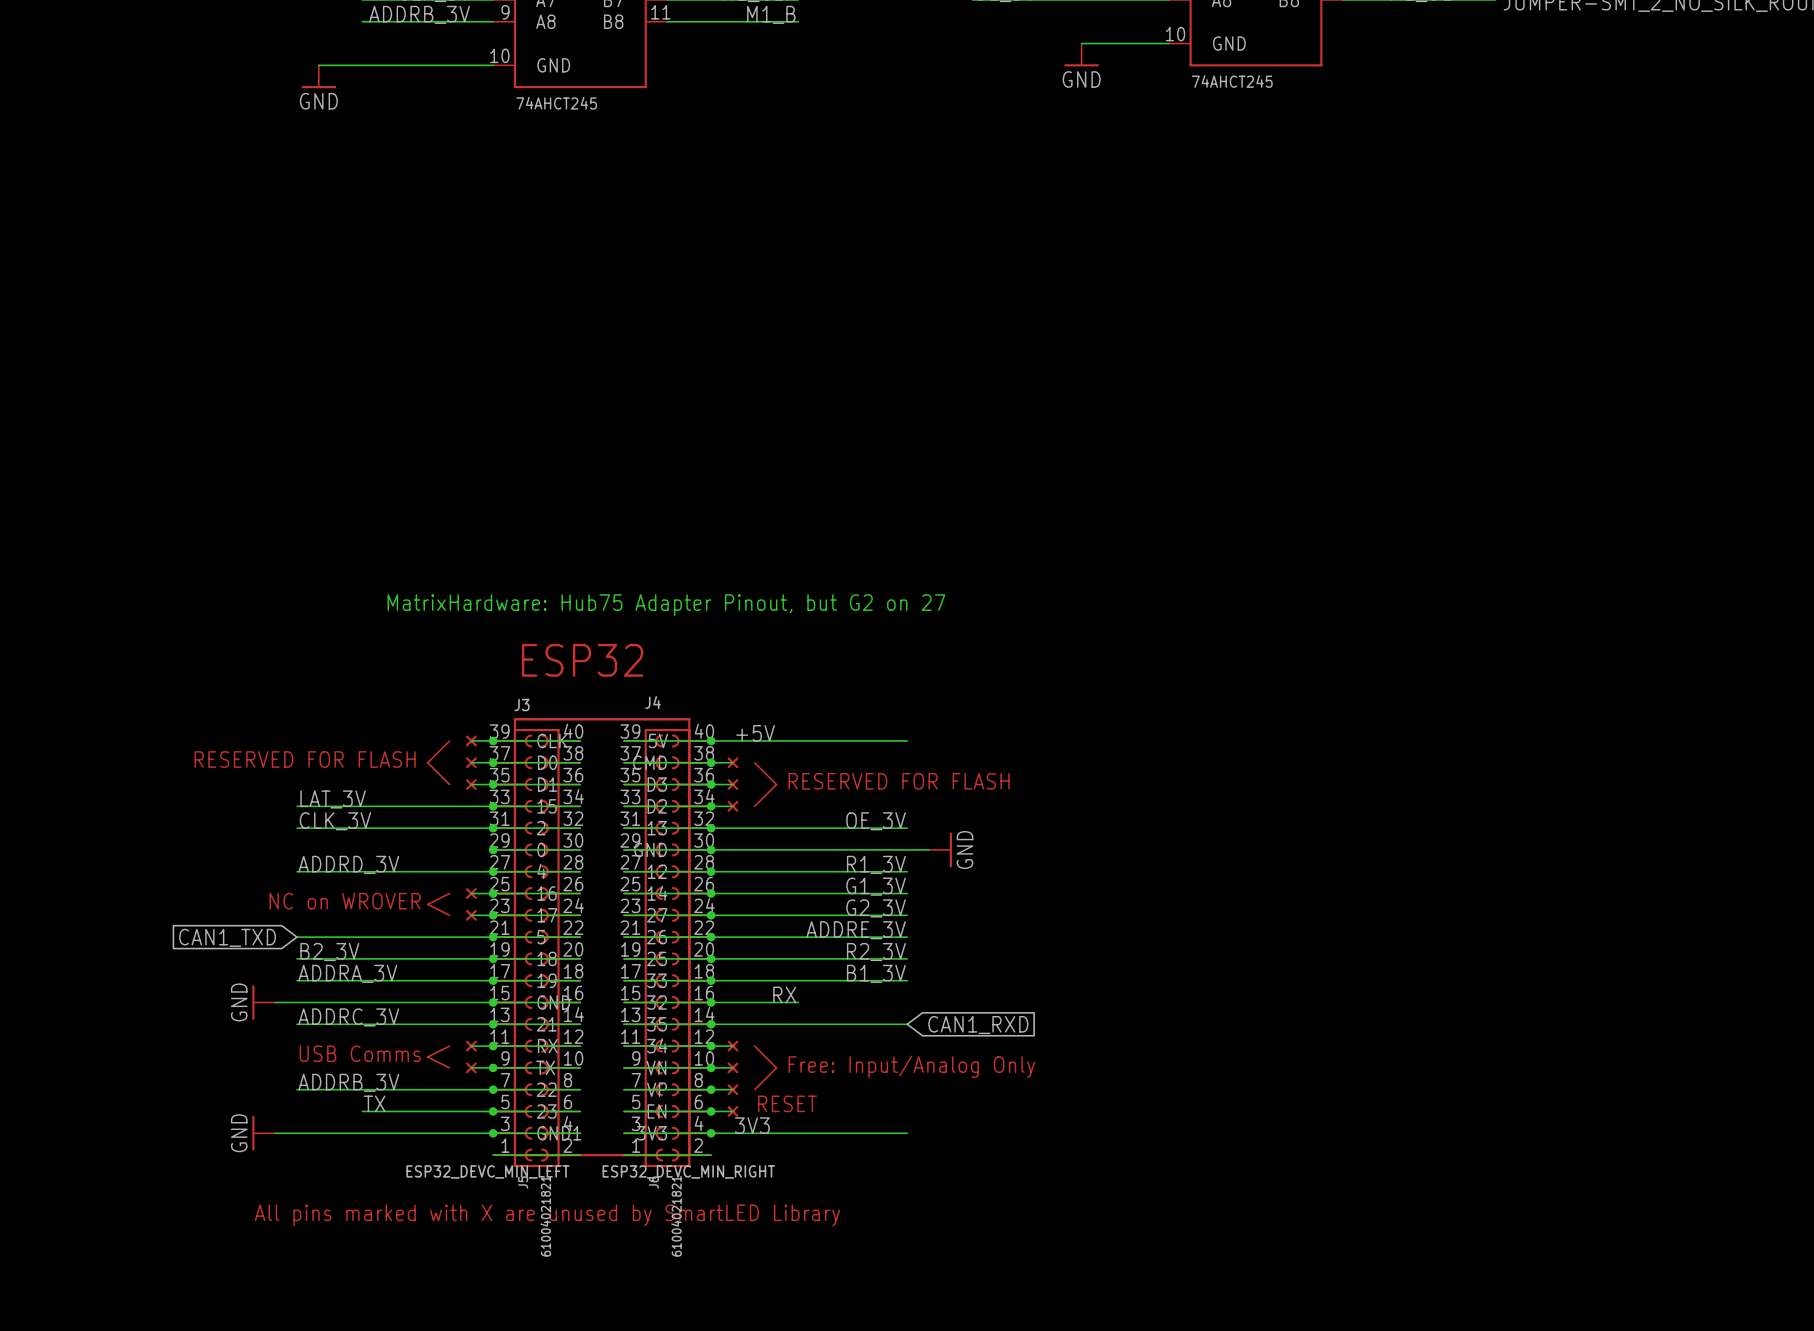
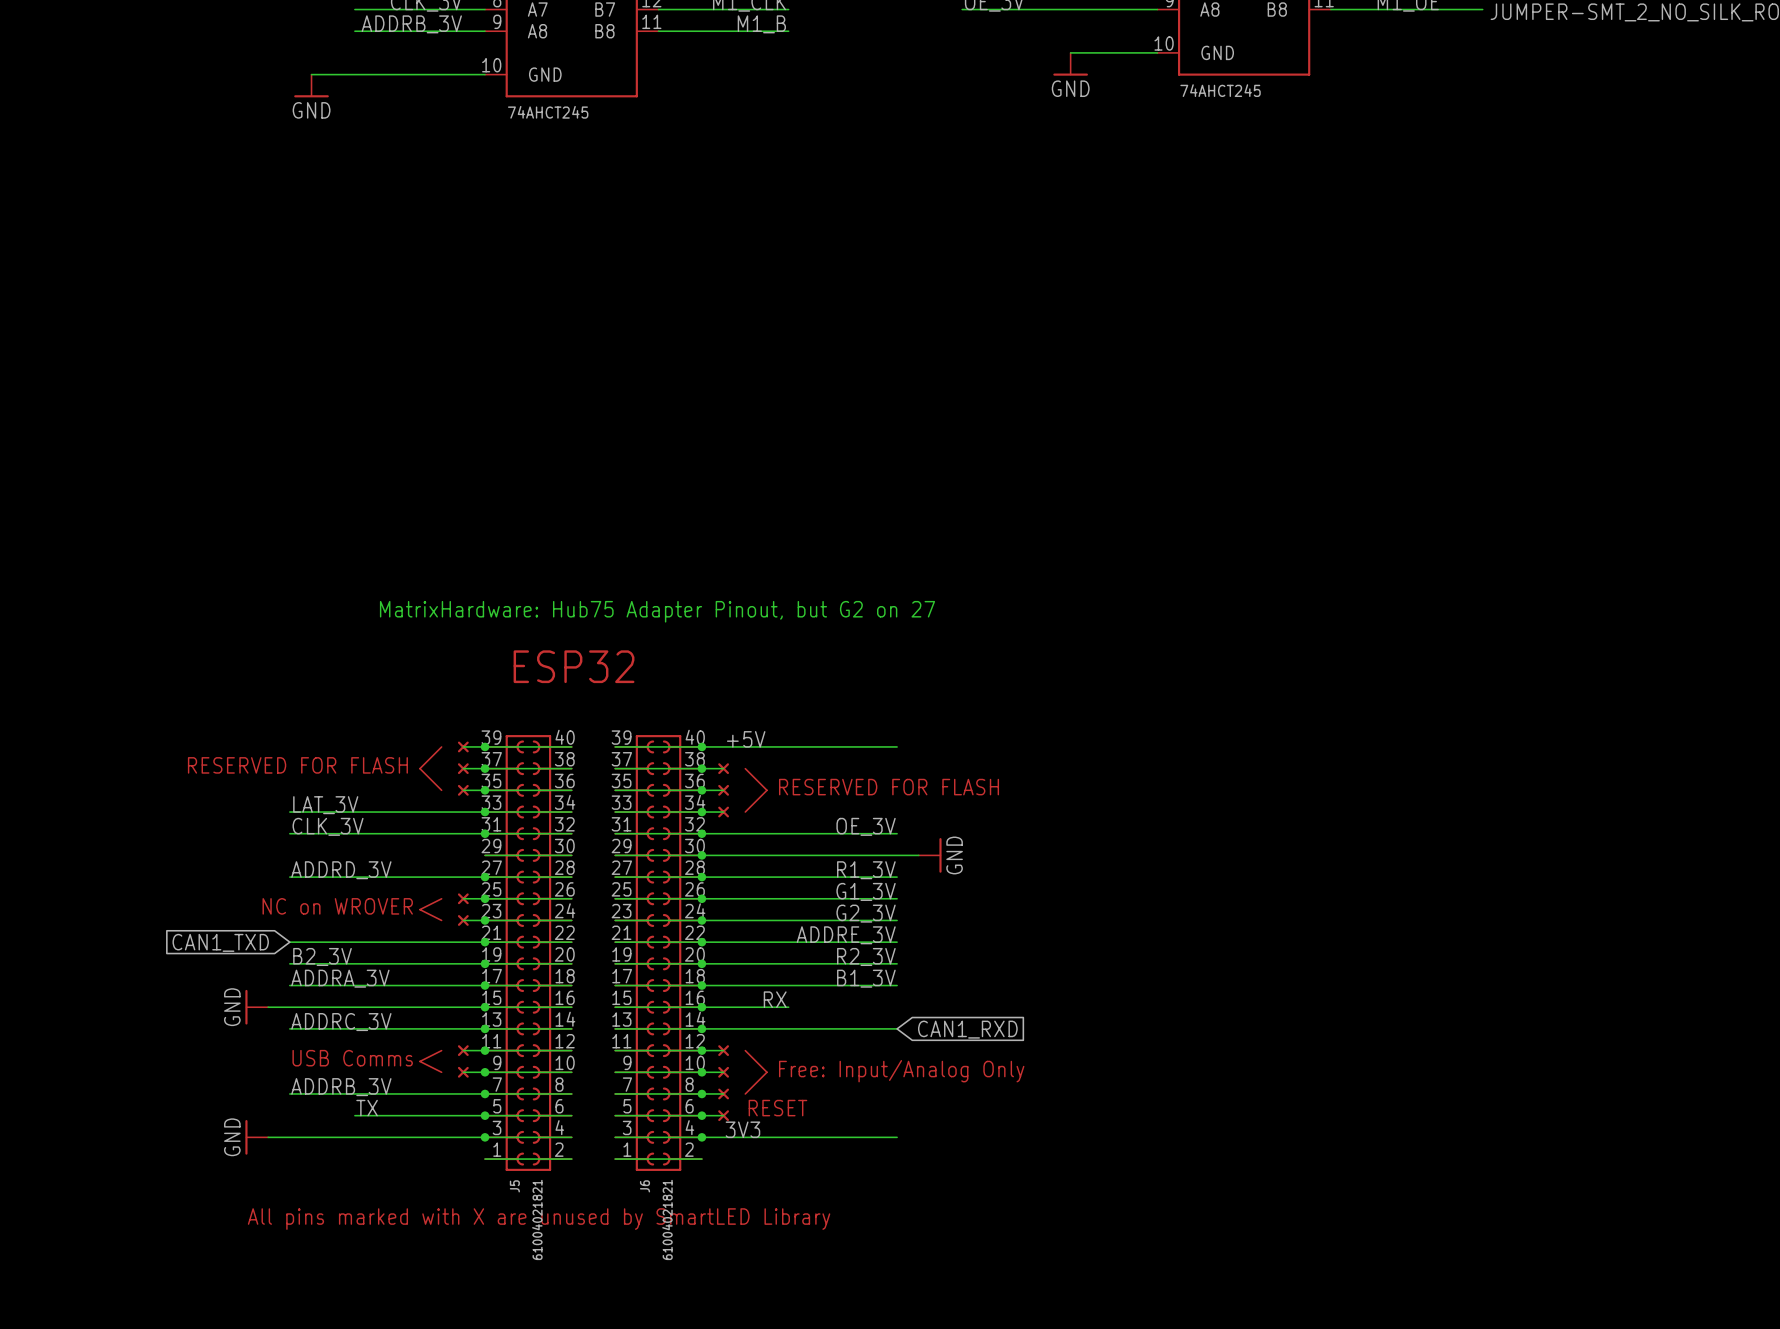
junction: (493, 849) -> none
J3: ESP32_DEVC_MIN_LEFT (591, 937) -> none
J4: ESP32_DEVC_MIN_RIGHT (612, 937) -> none

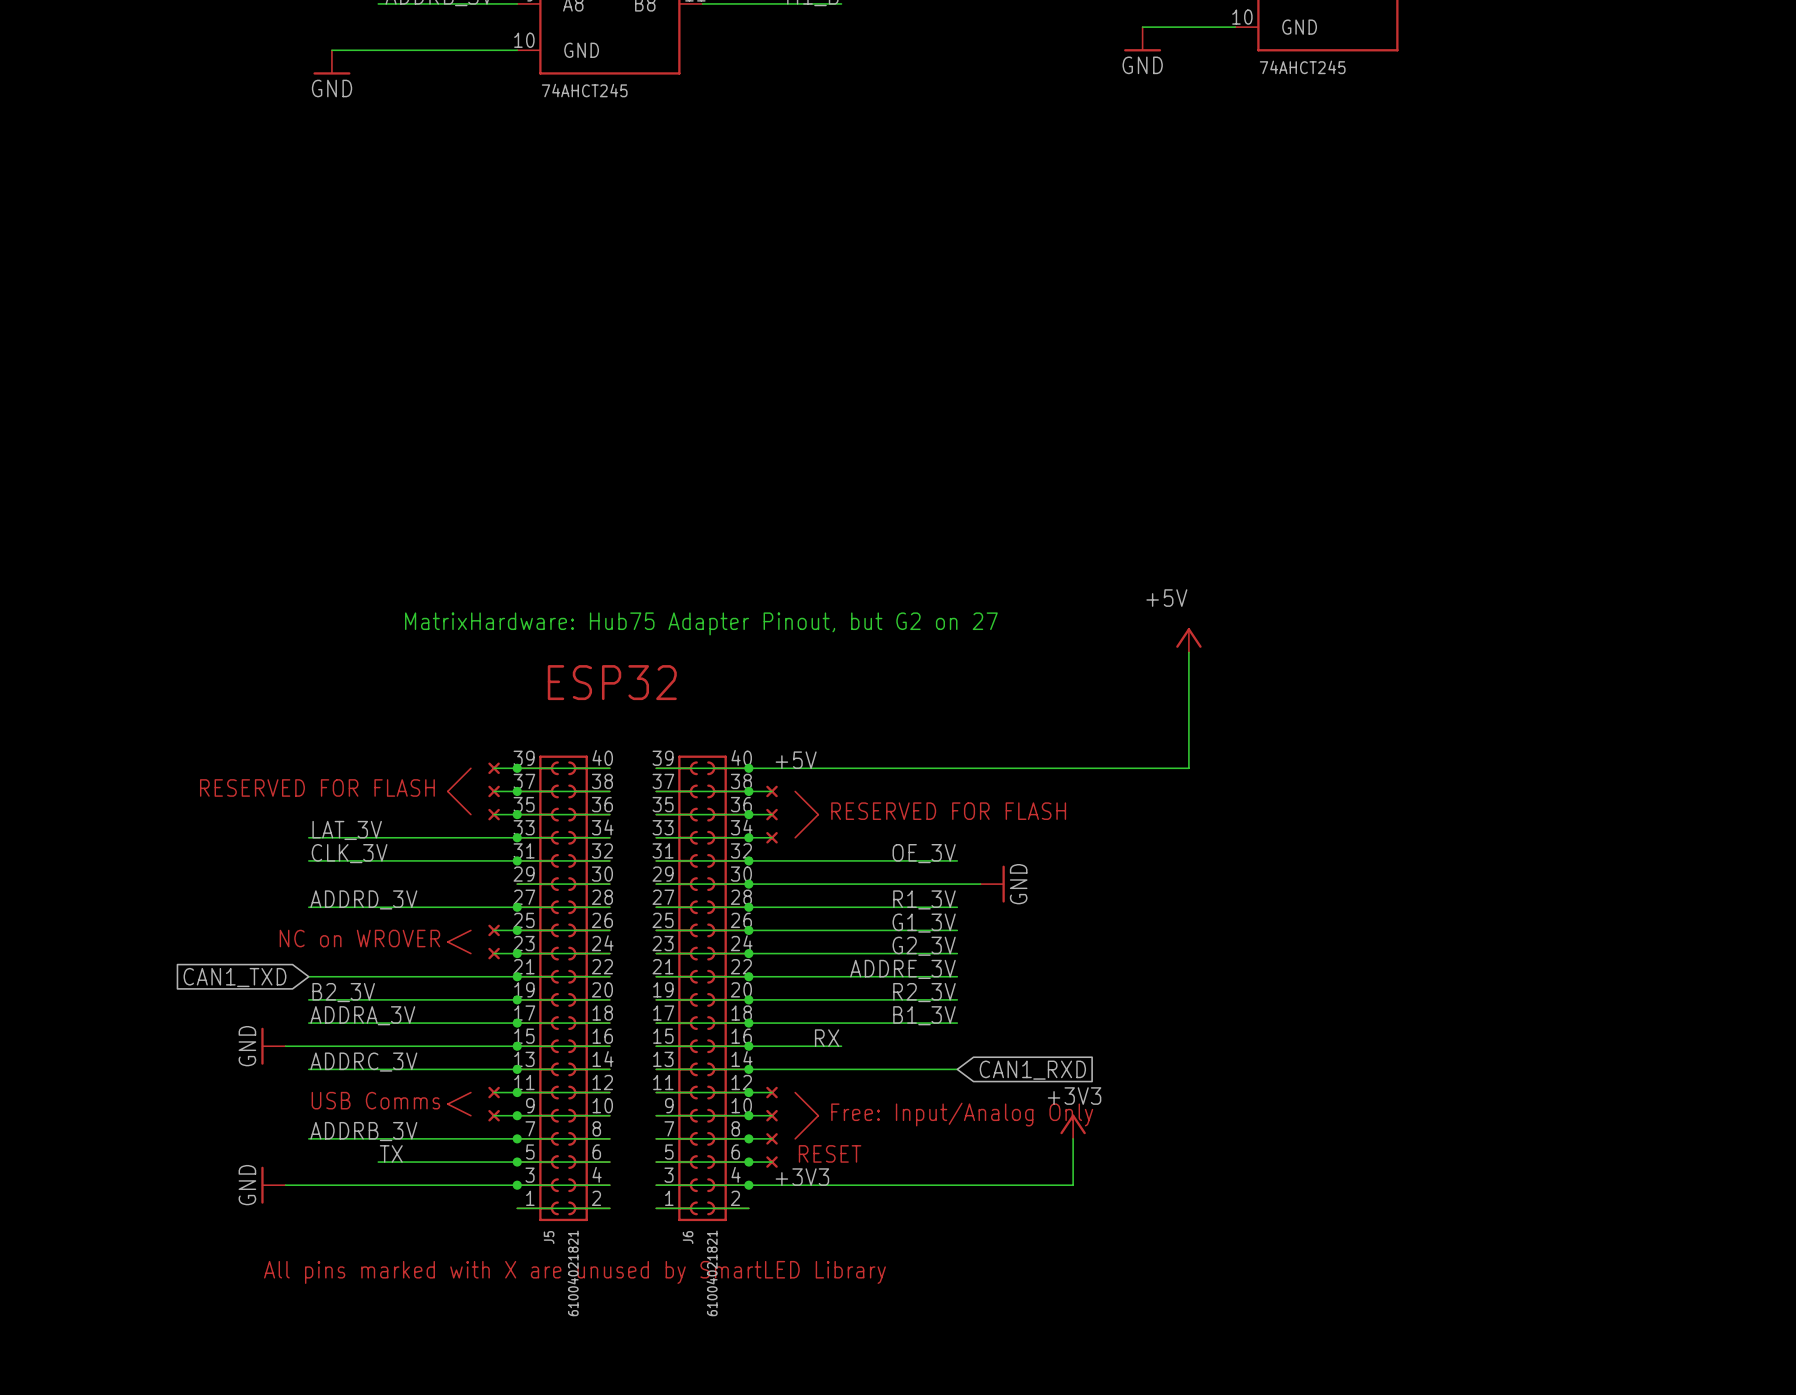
power symbol: none -> +5V (1188, 640)
wire: none -> (1188, 652) (1188, 768) (957, 768)
power symbol: none -> +3V3 (1073, 1126)
wire: none -> (1073, 1138) (1073, 1185) (957, 1185)
label: 3V3 (742, 1129) -> +3V3 (802, 1177)

